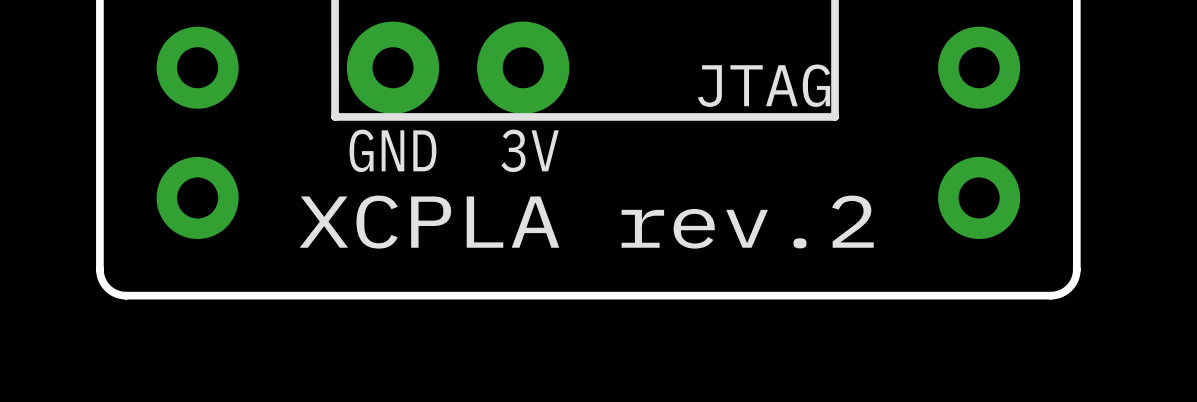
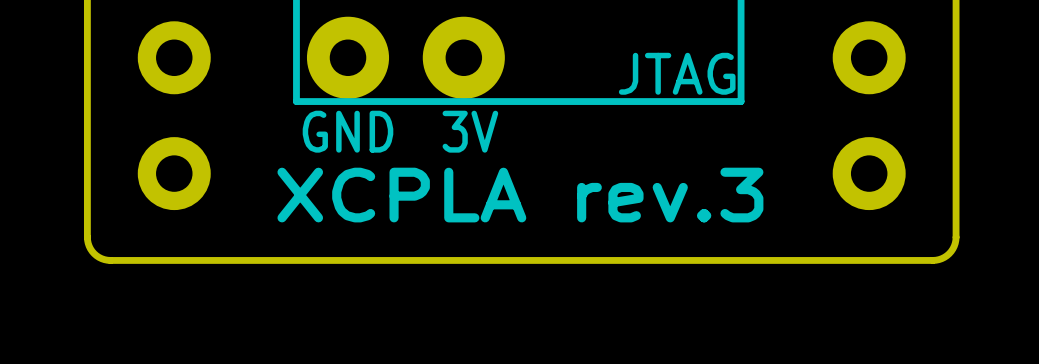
text: XCPLA rev.2 (586, 222) -> XCPLA rev.3 (520, 195)

